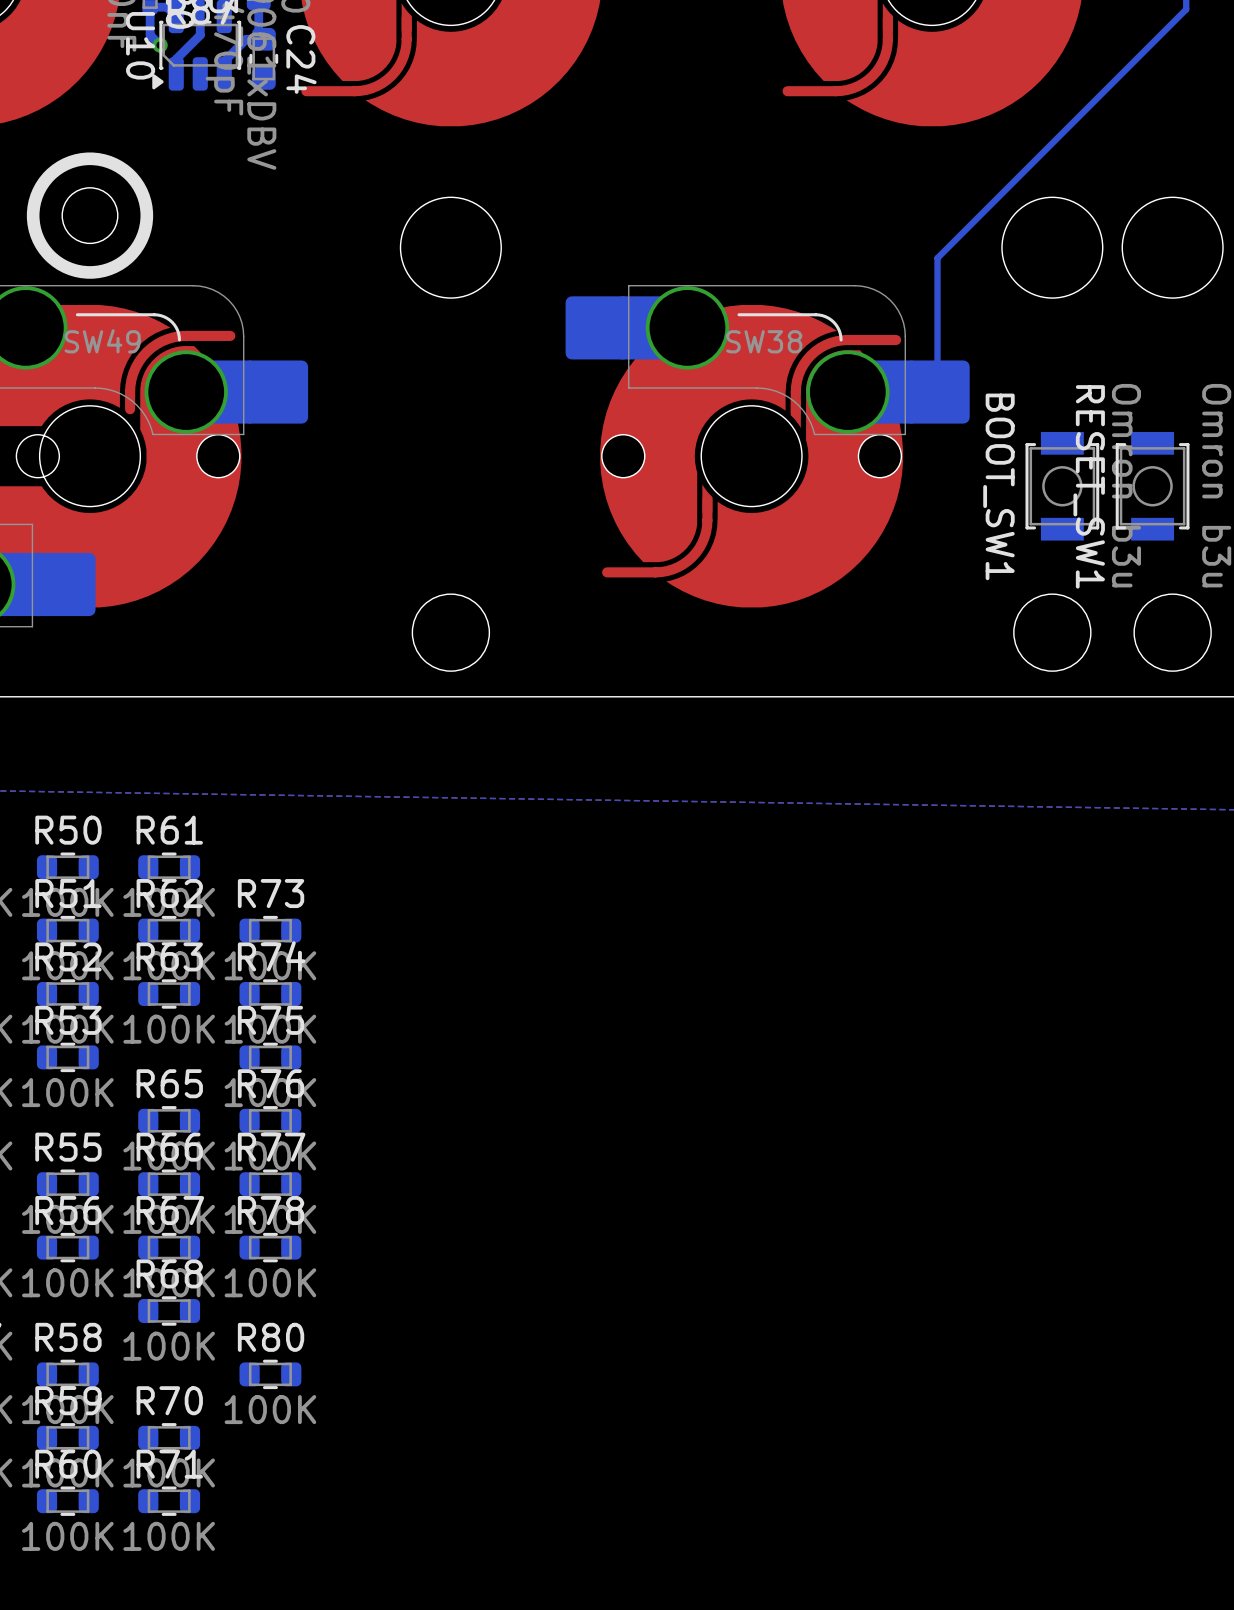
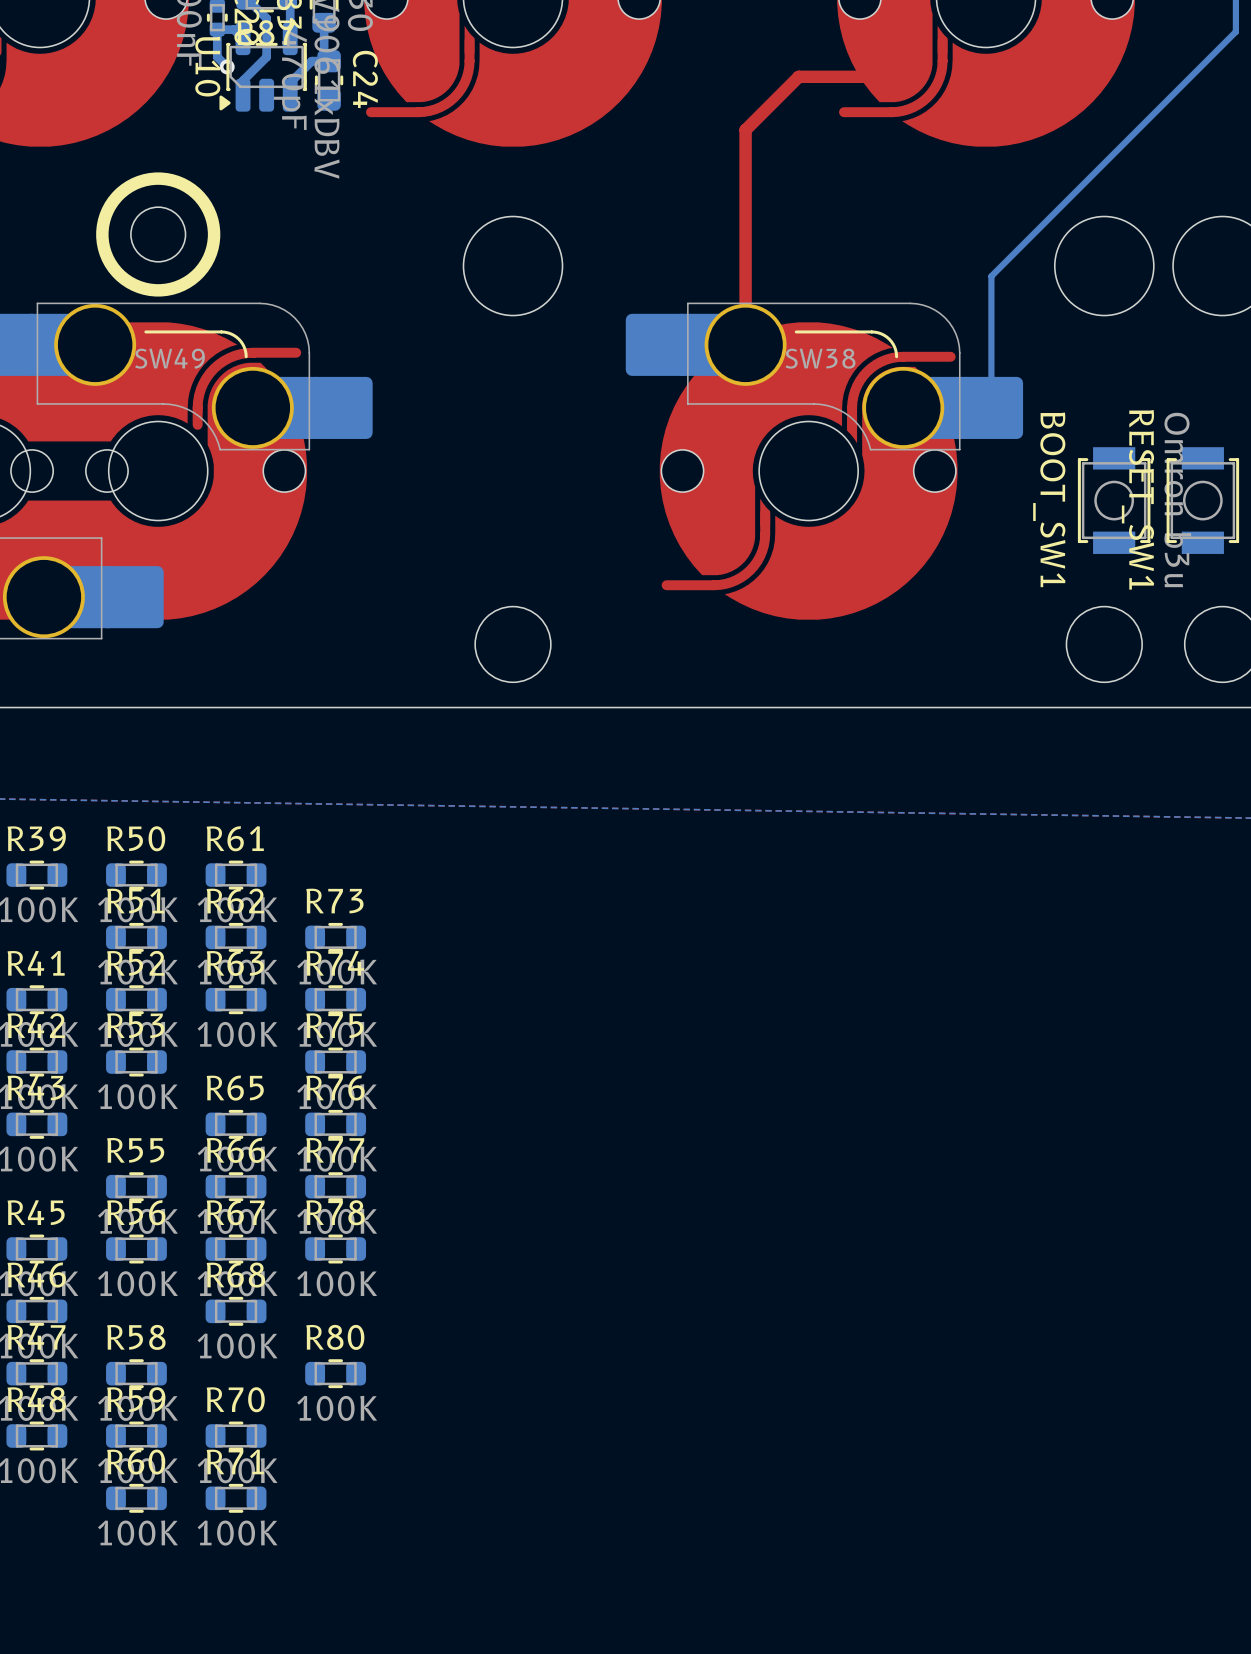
top track: none -> (907, 76) (798, 76) (745, 130) (745, 344)

